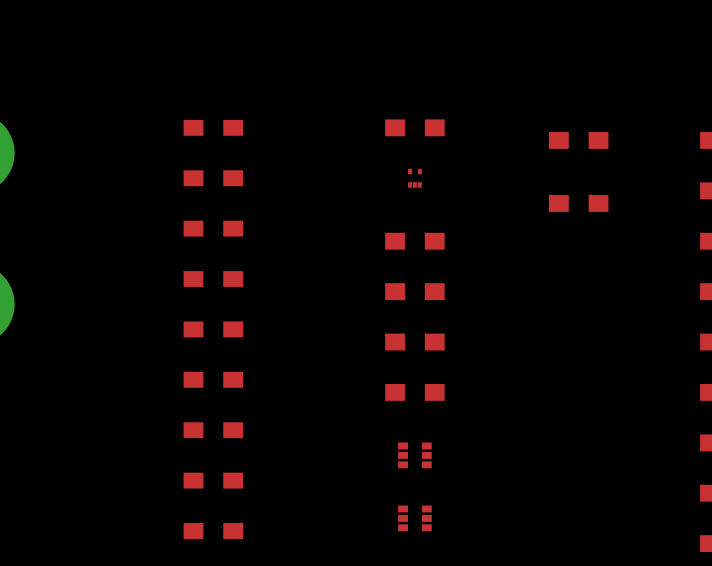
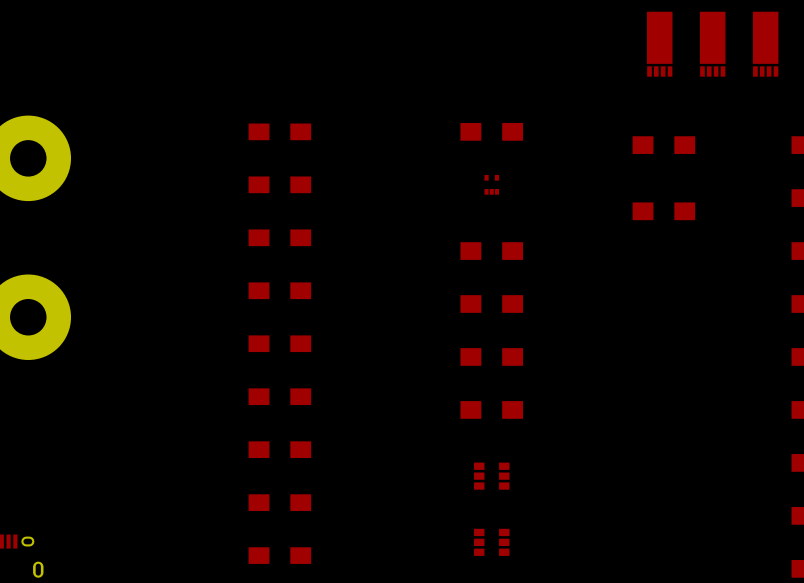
part: none -> (659, 44)
part: none -> (712, 44)
part: none -> (765, 44)

